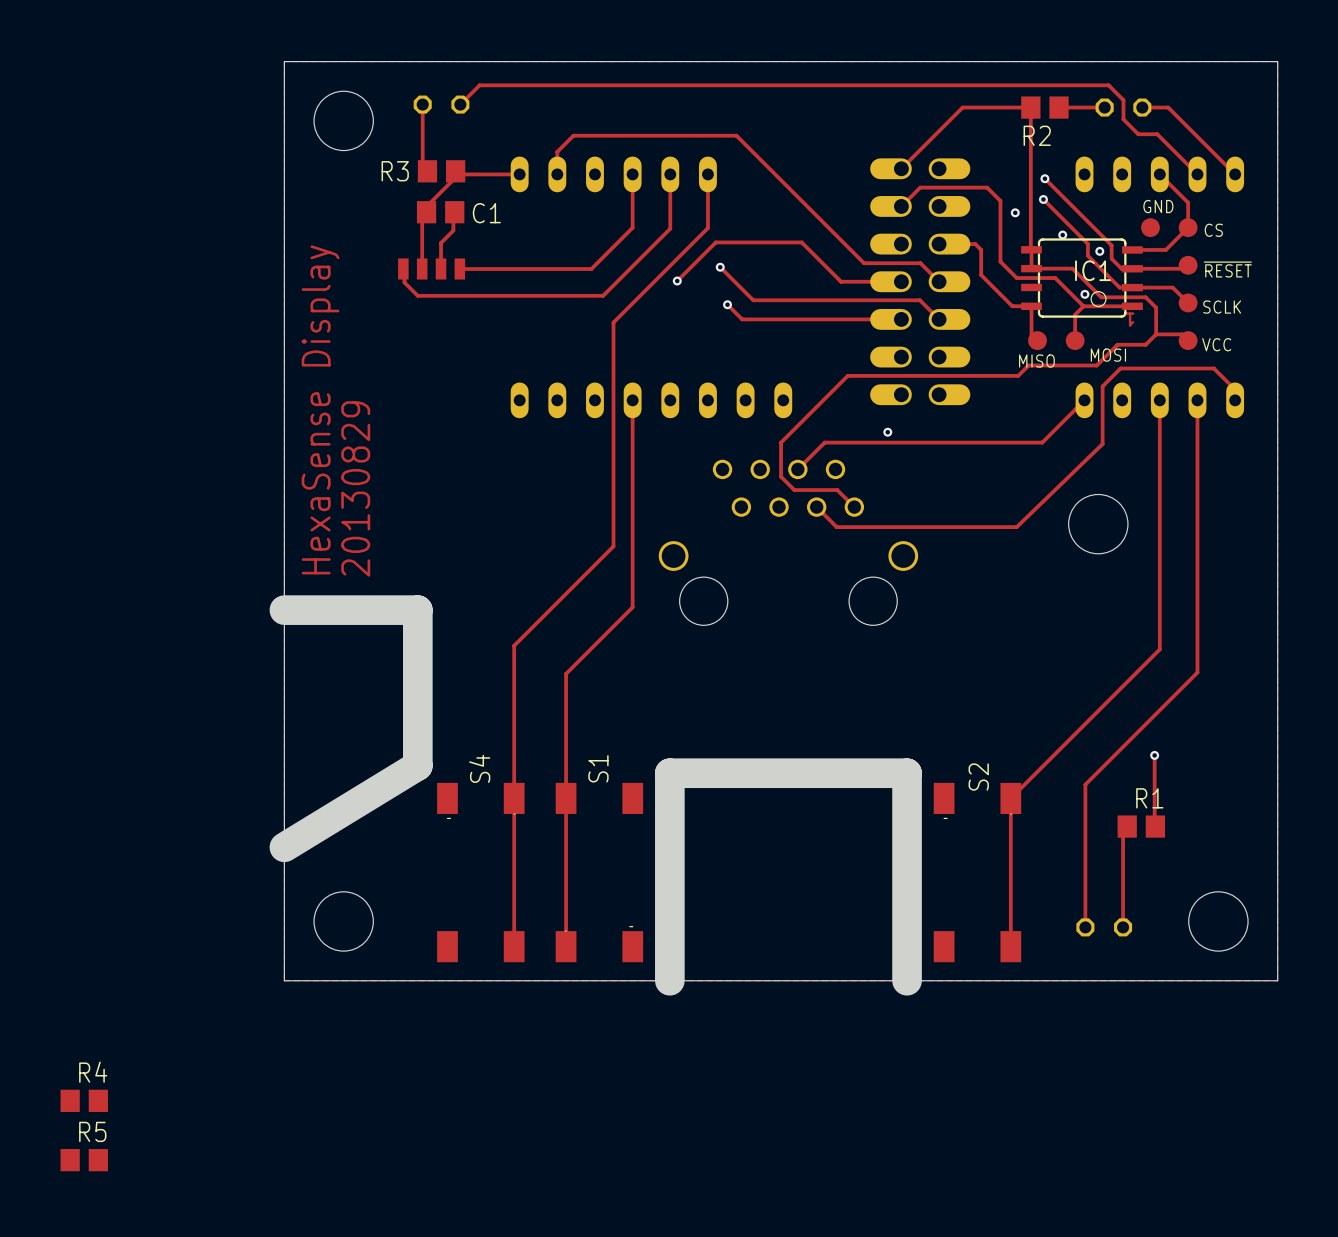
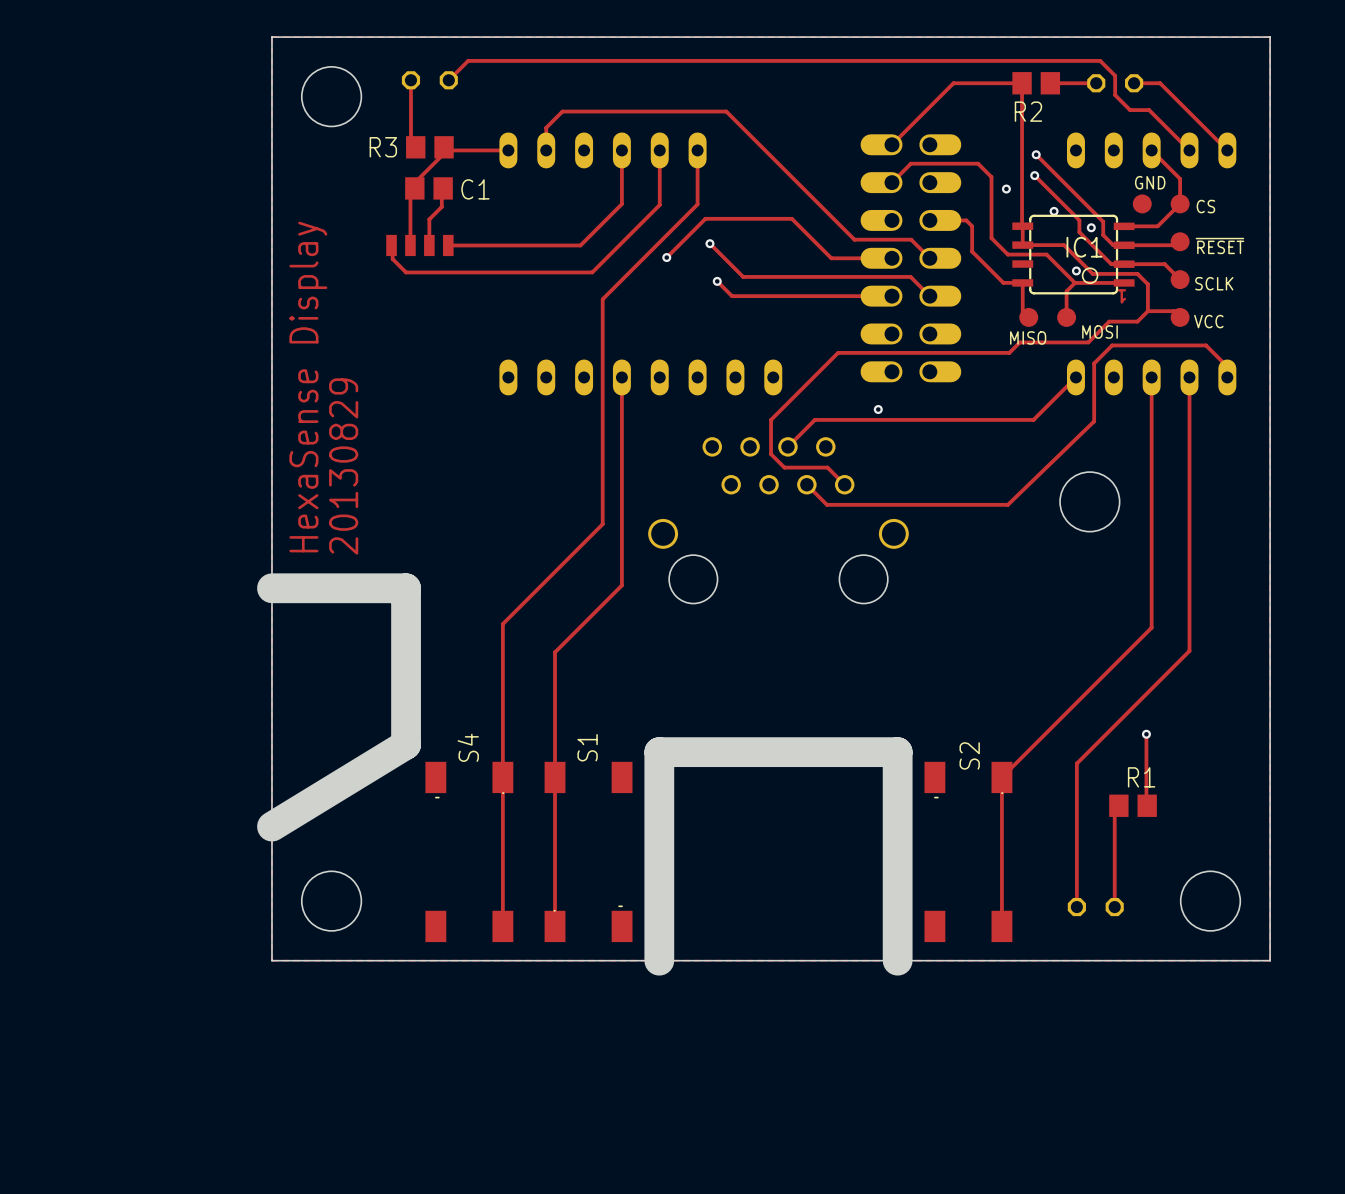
R4: (84, 1100) -> none
R5: (84, 1160) -> none

